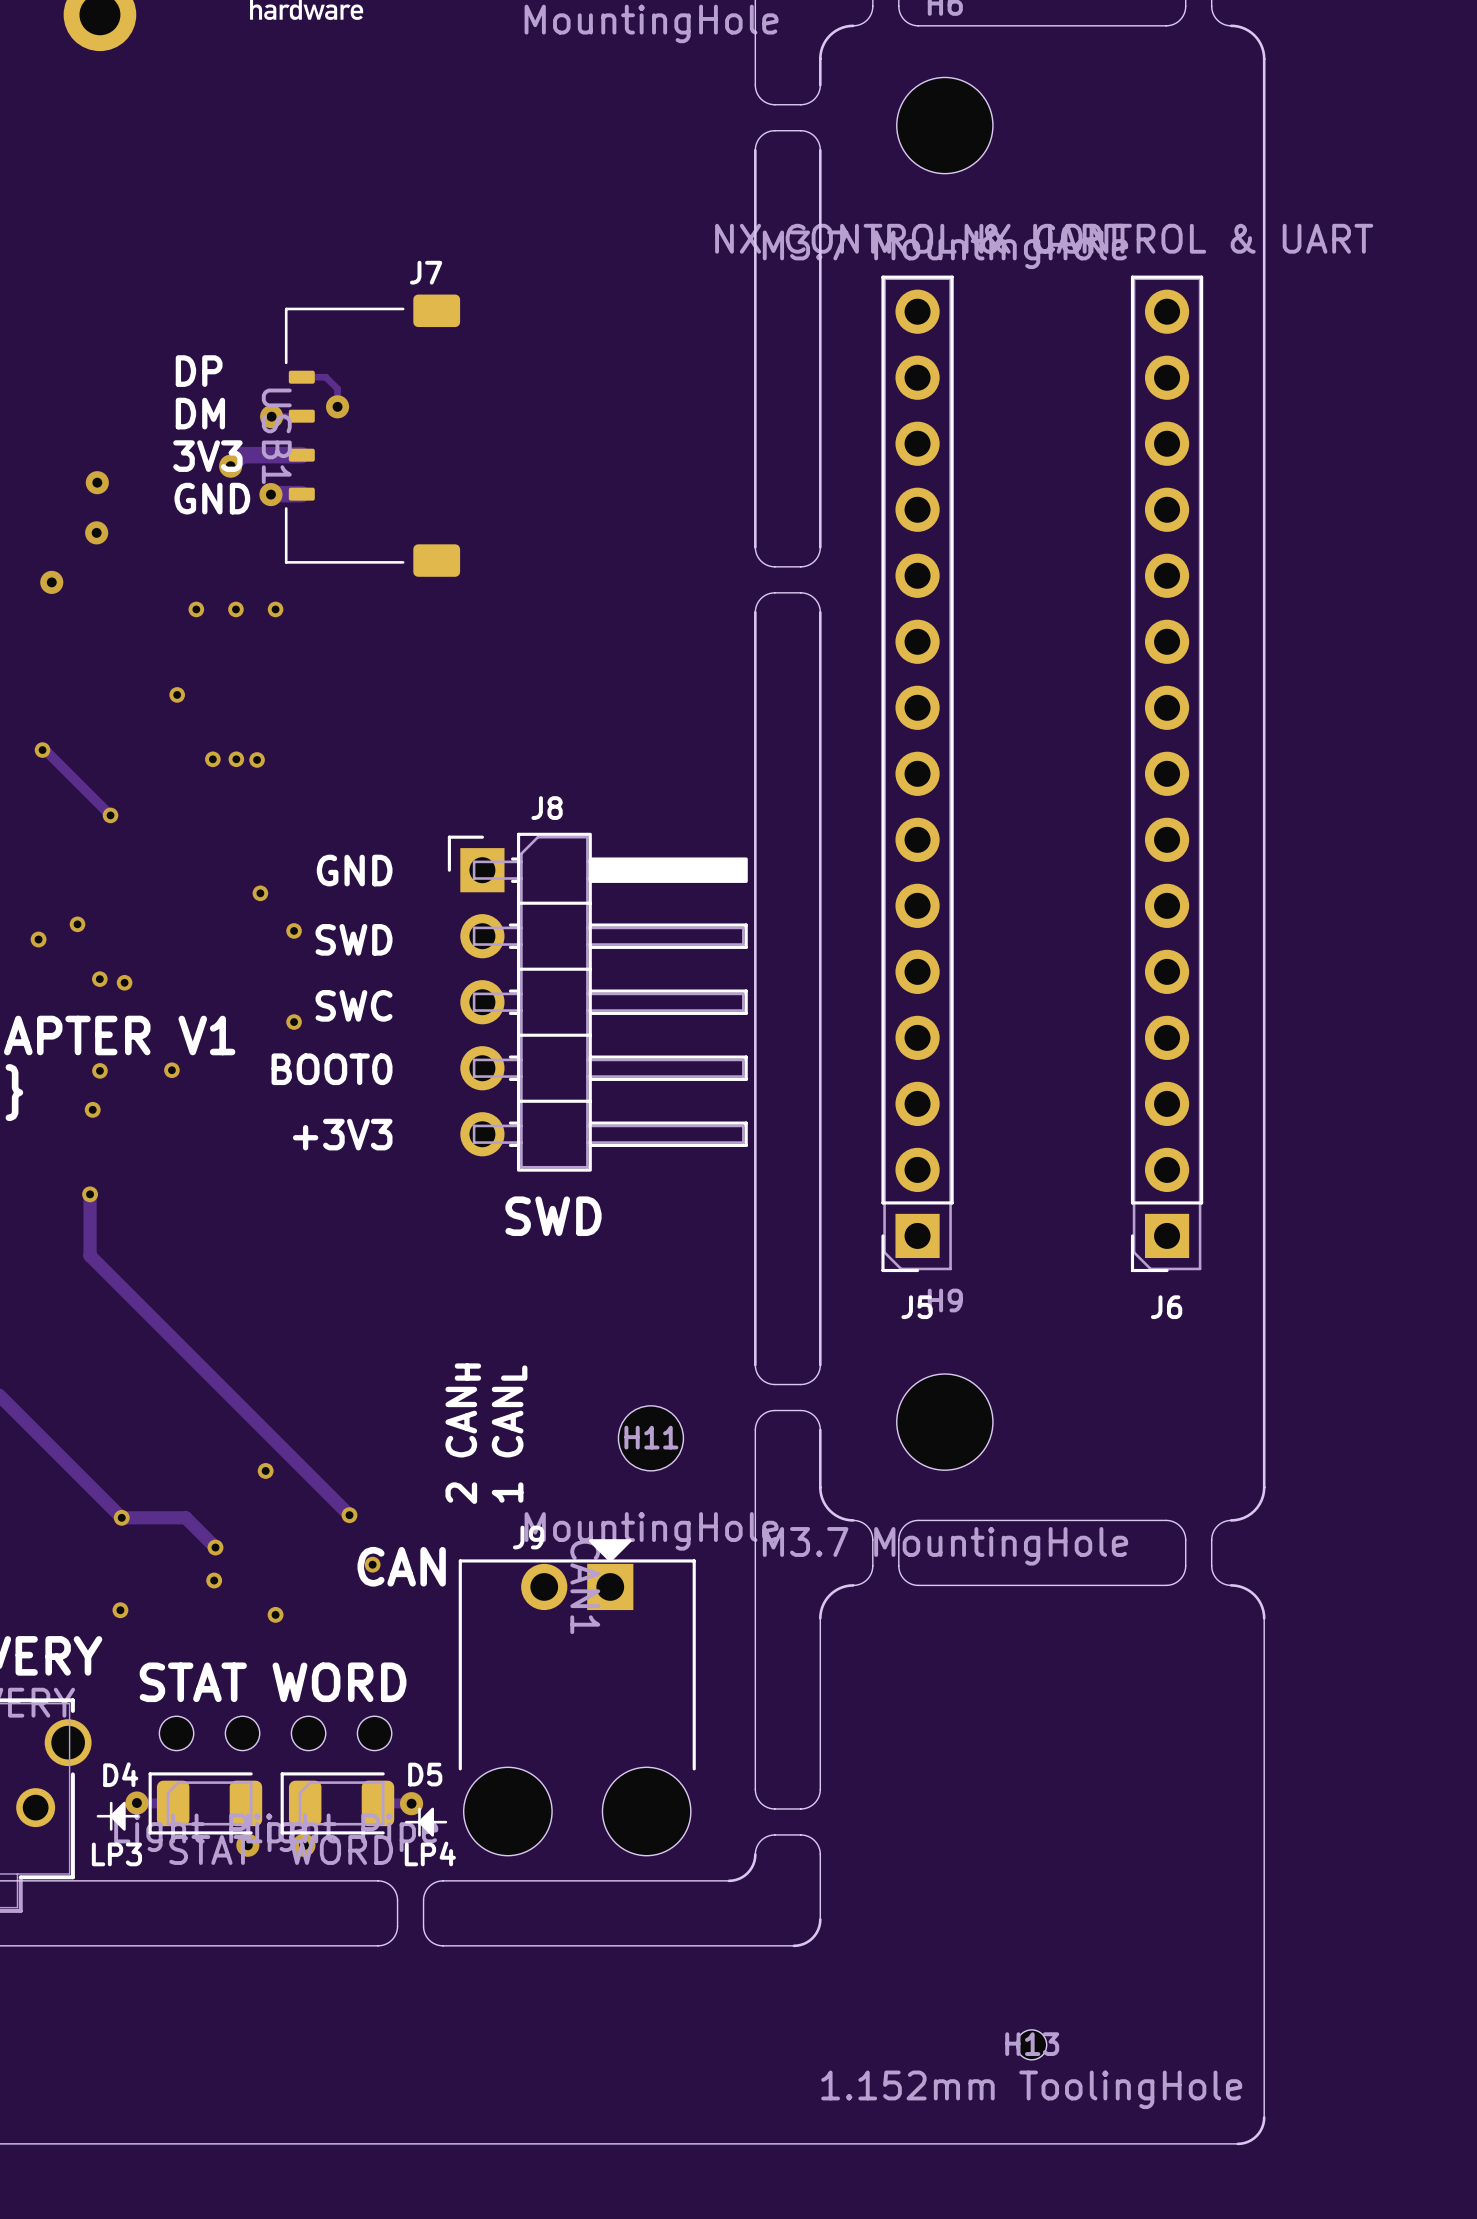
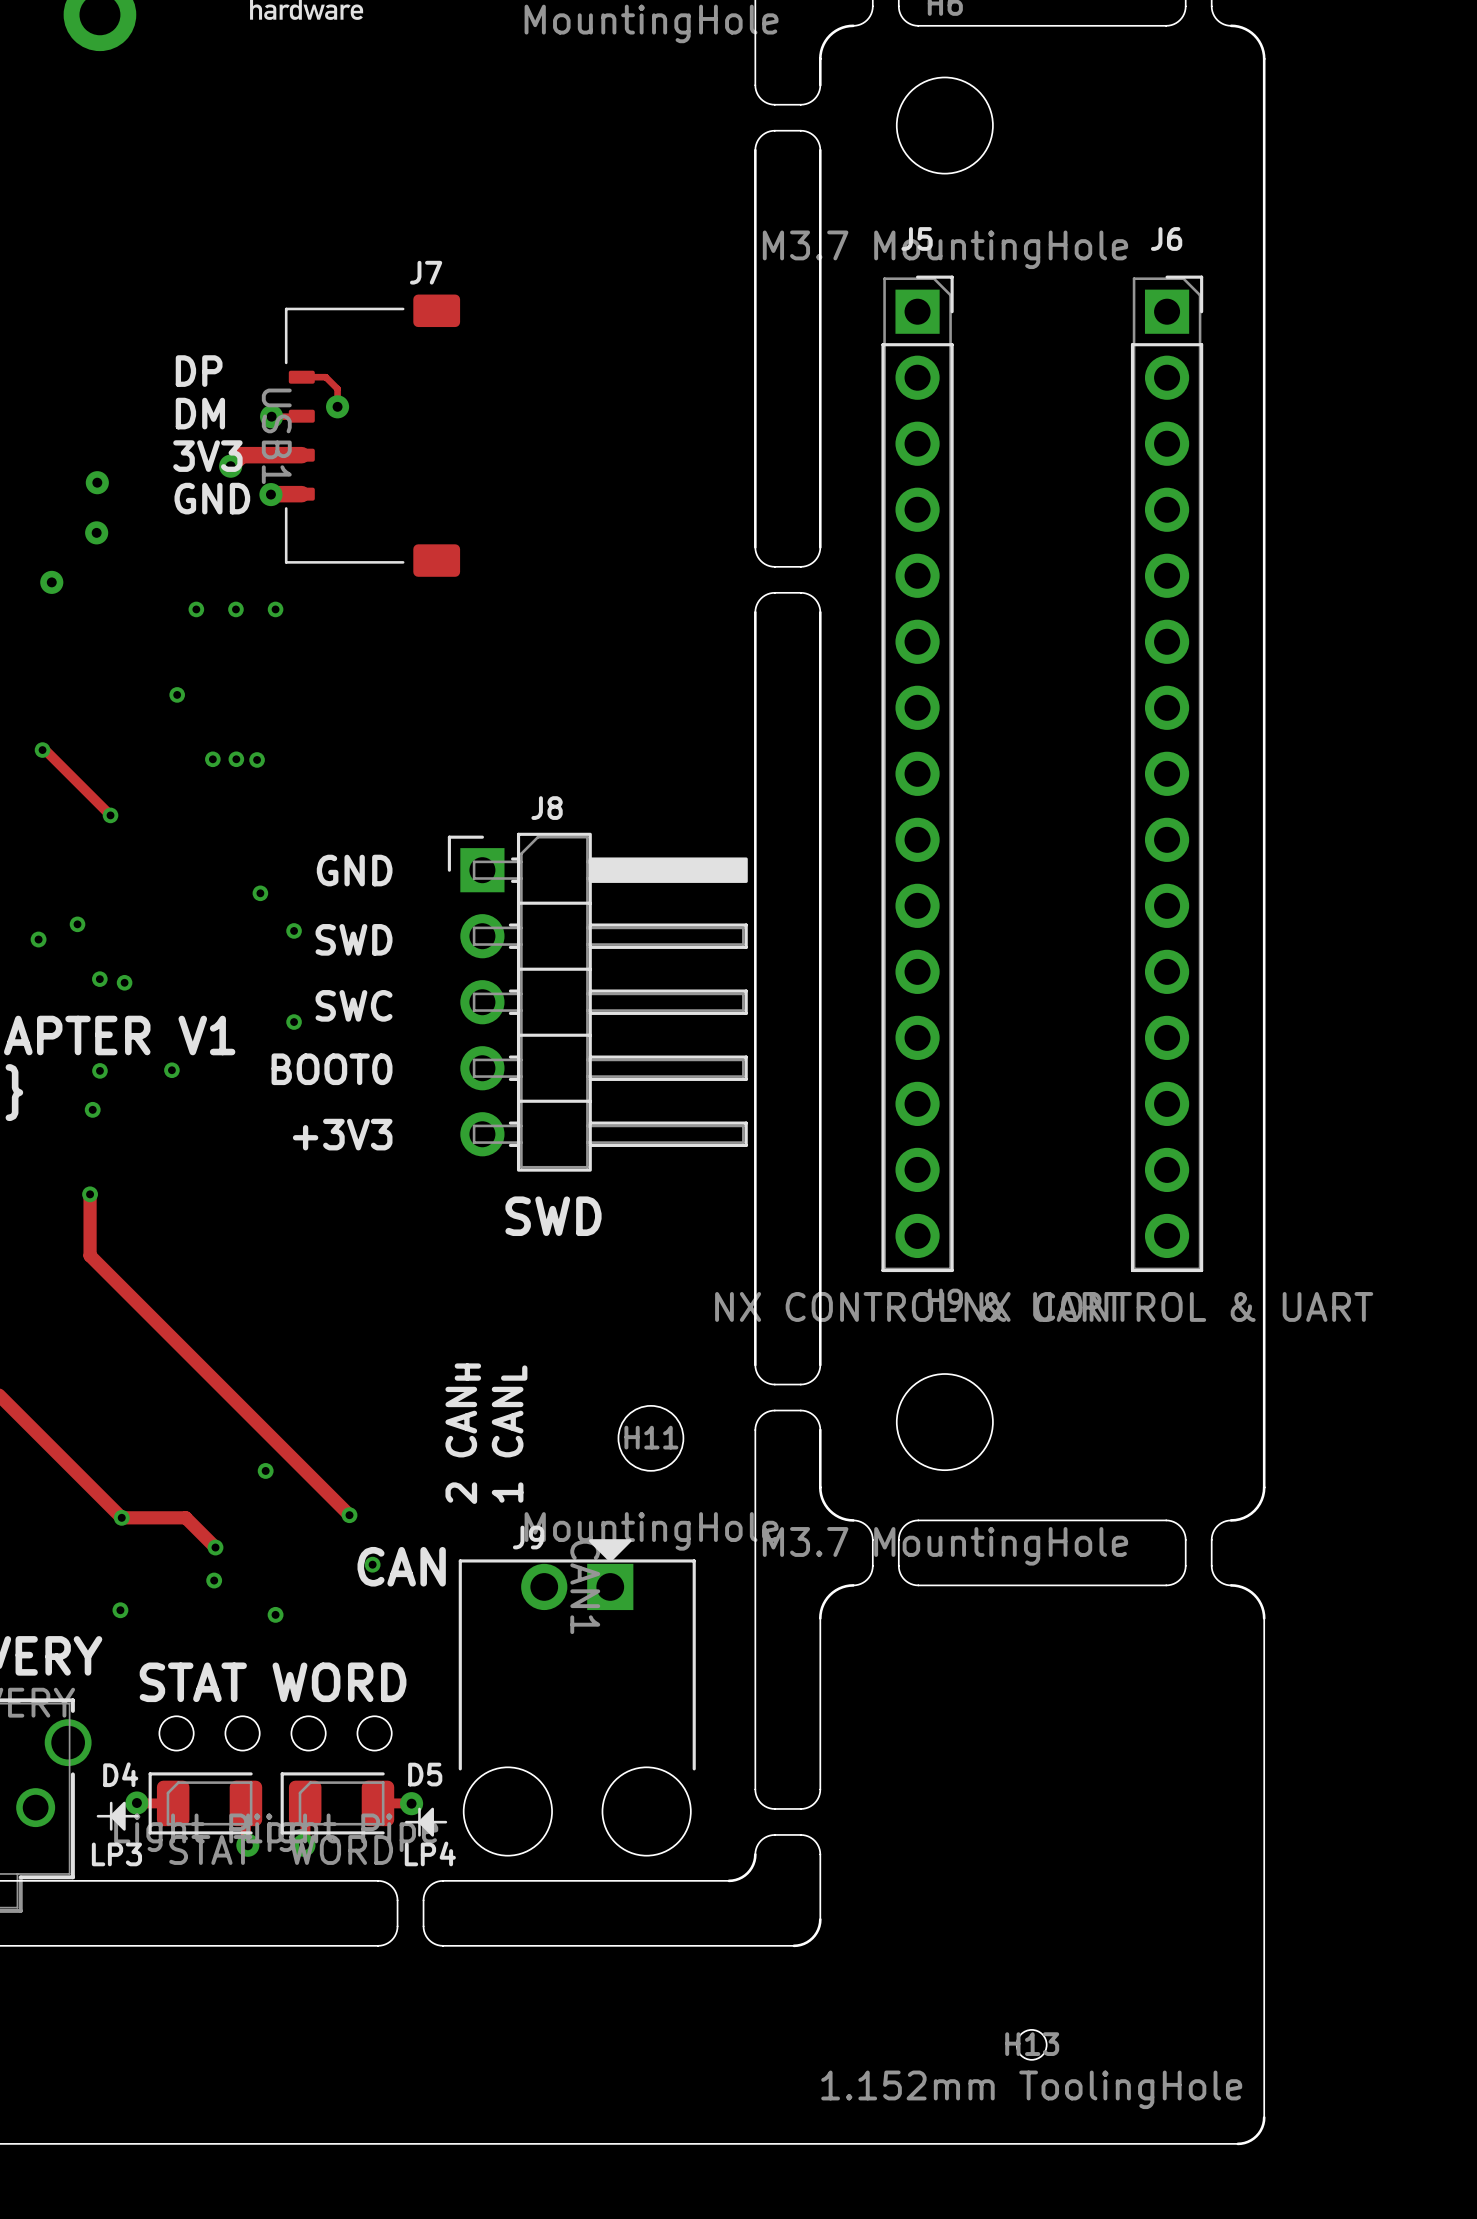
J5 rotation: 0° (917, 773) -> 180° (917, 773)
J6 rotation: 0° (1167, 773) -> 180° (1167, 773)

